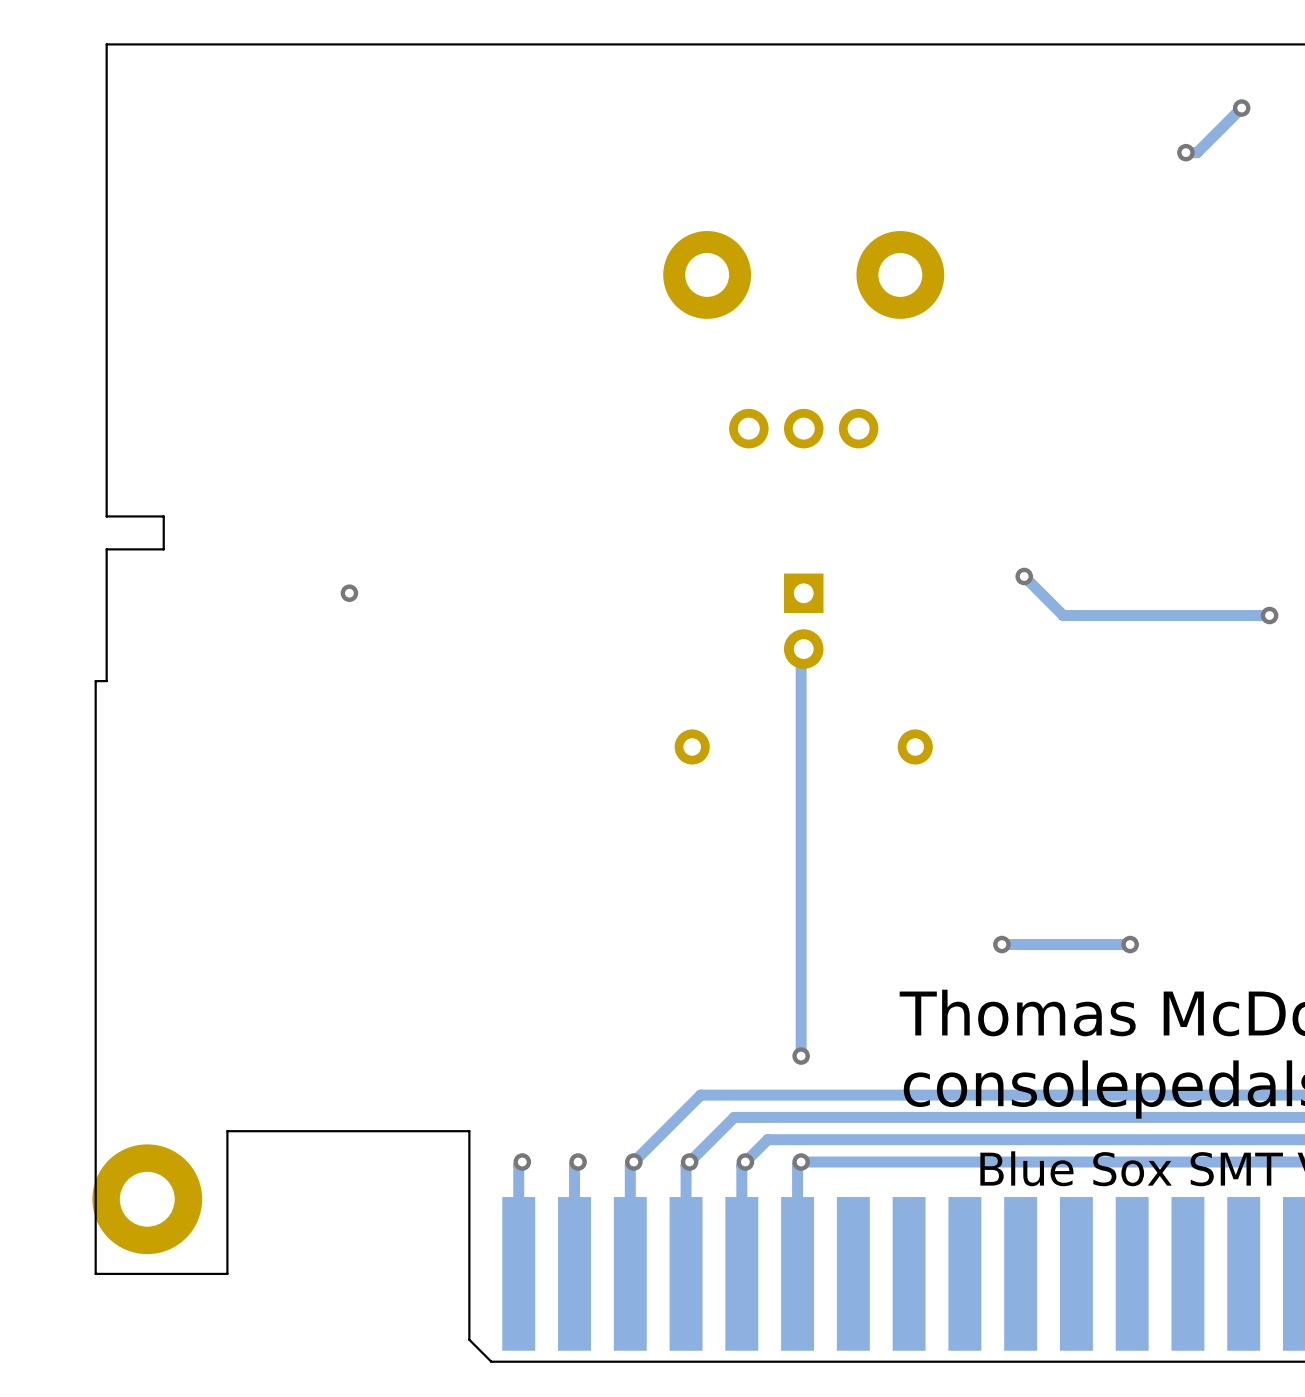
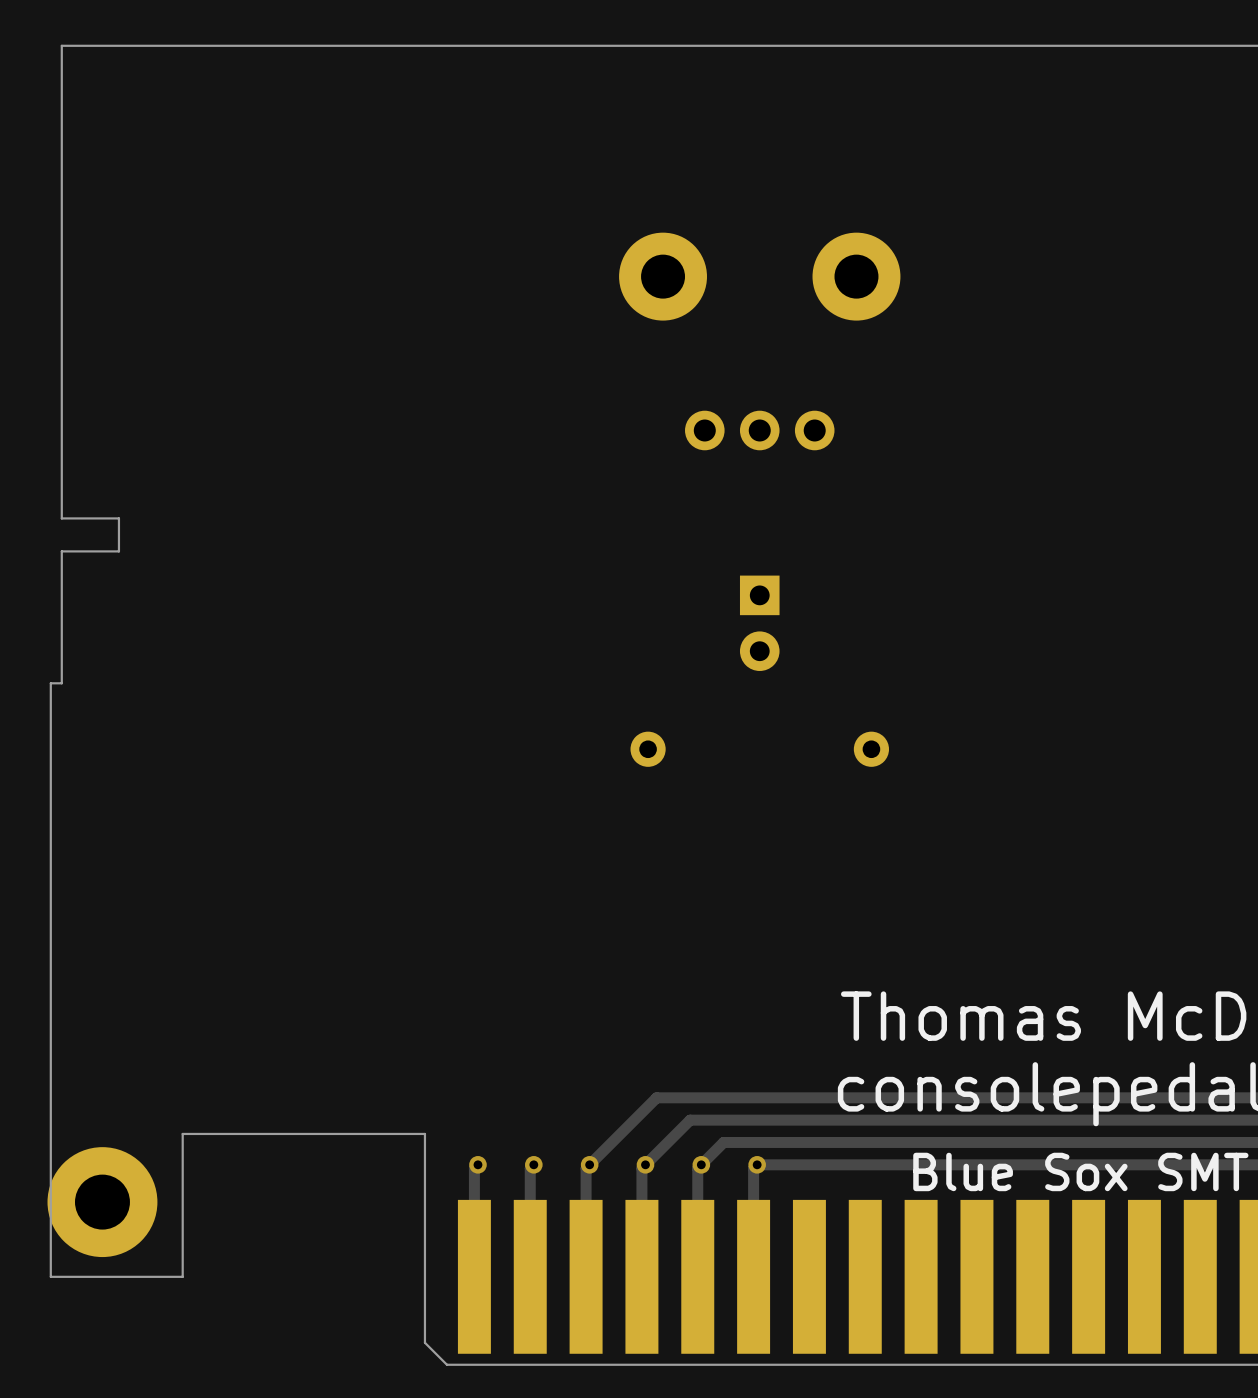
track: (1241, 108) (1197, 152) (1185, 152) -> none
via: (1241, 108) -> none
via: (1185, 152) -> none
track: (1024, 576) (1063, 615) (1269, 615) -> none
via: (1024, 576) -> none
via: (349, 593) -> none
via: (1269, 615) -> none
track: (803, 649) (801, 651) (801, 1056) -> none
via: (1001, 944) -> none
track: (1130, 944) (1001, 944) -> none
via: (1130, 944) -> none
via: (801, 1056) -> none

